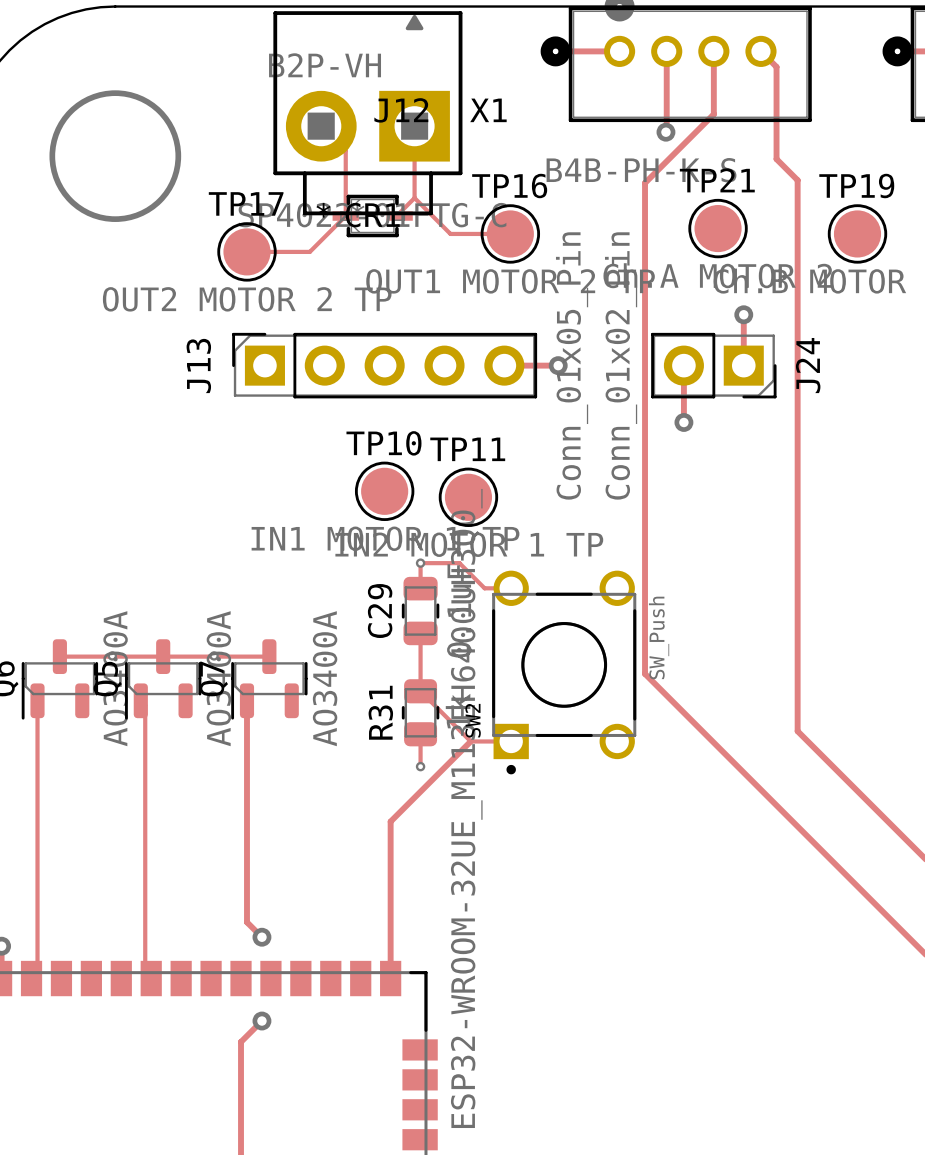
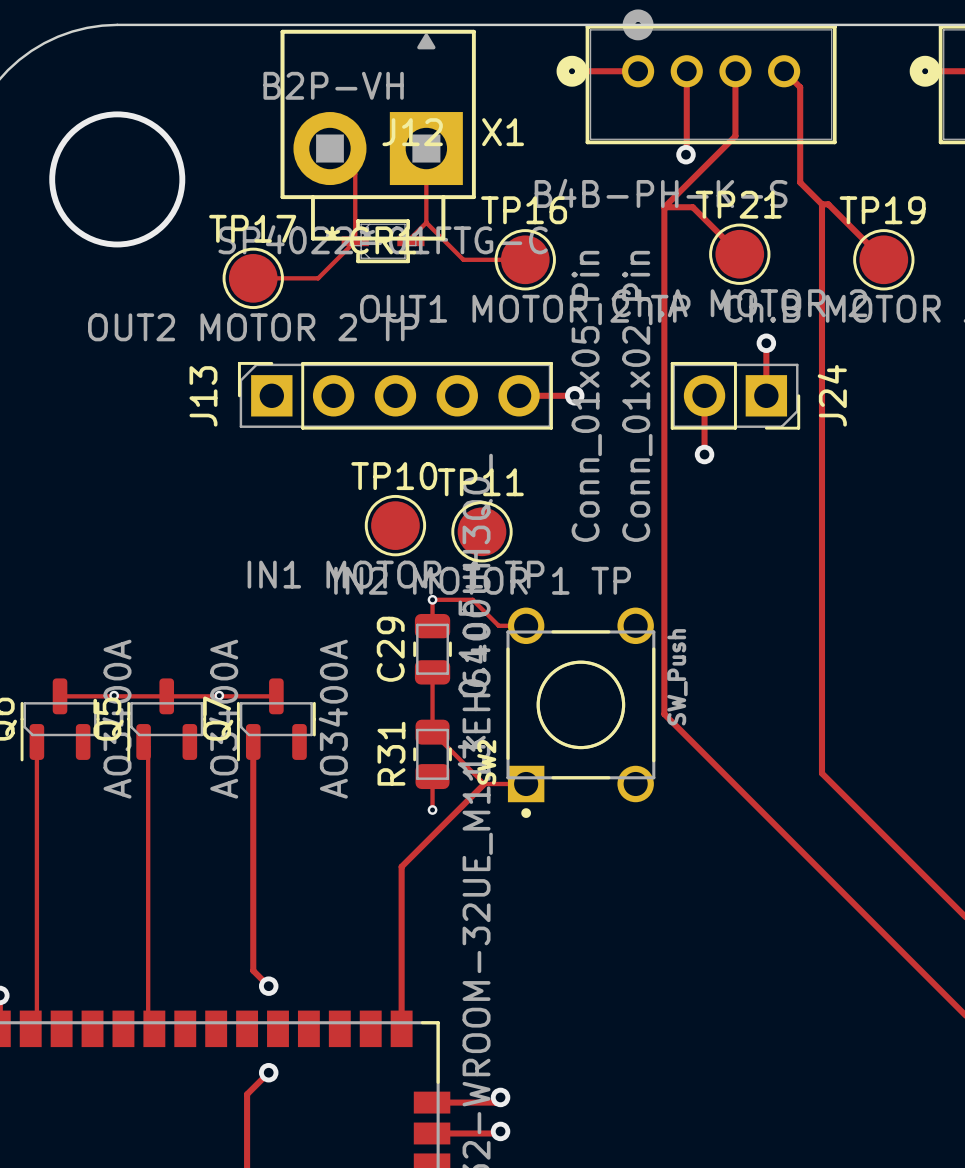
track: none -> (822, 204) (828, 204) (883, 259)
track: none -> (664, 207) (692, 207) (739, 254)
track: none -> (500, 1097) (495, 1102) (432, 1102)
via: none -> (500, 1097)
track: none -> (500, 1131) (498, 1133) (432, 1133)
via: none -> (500, 1131)

